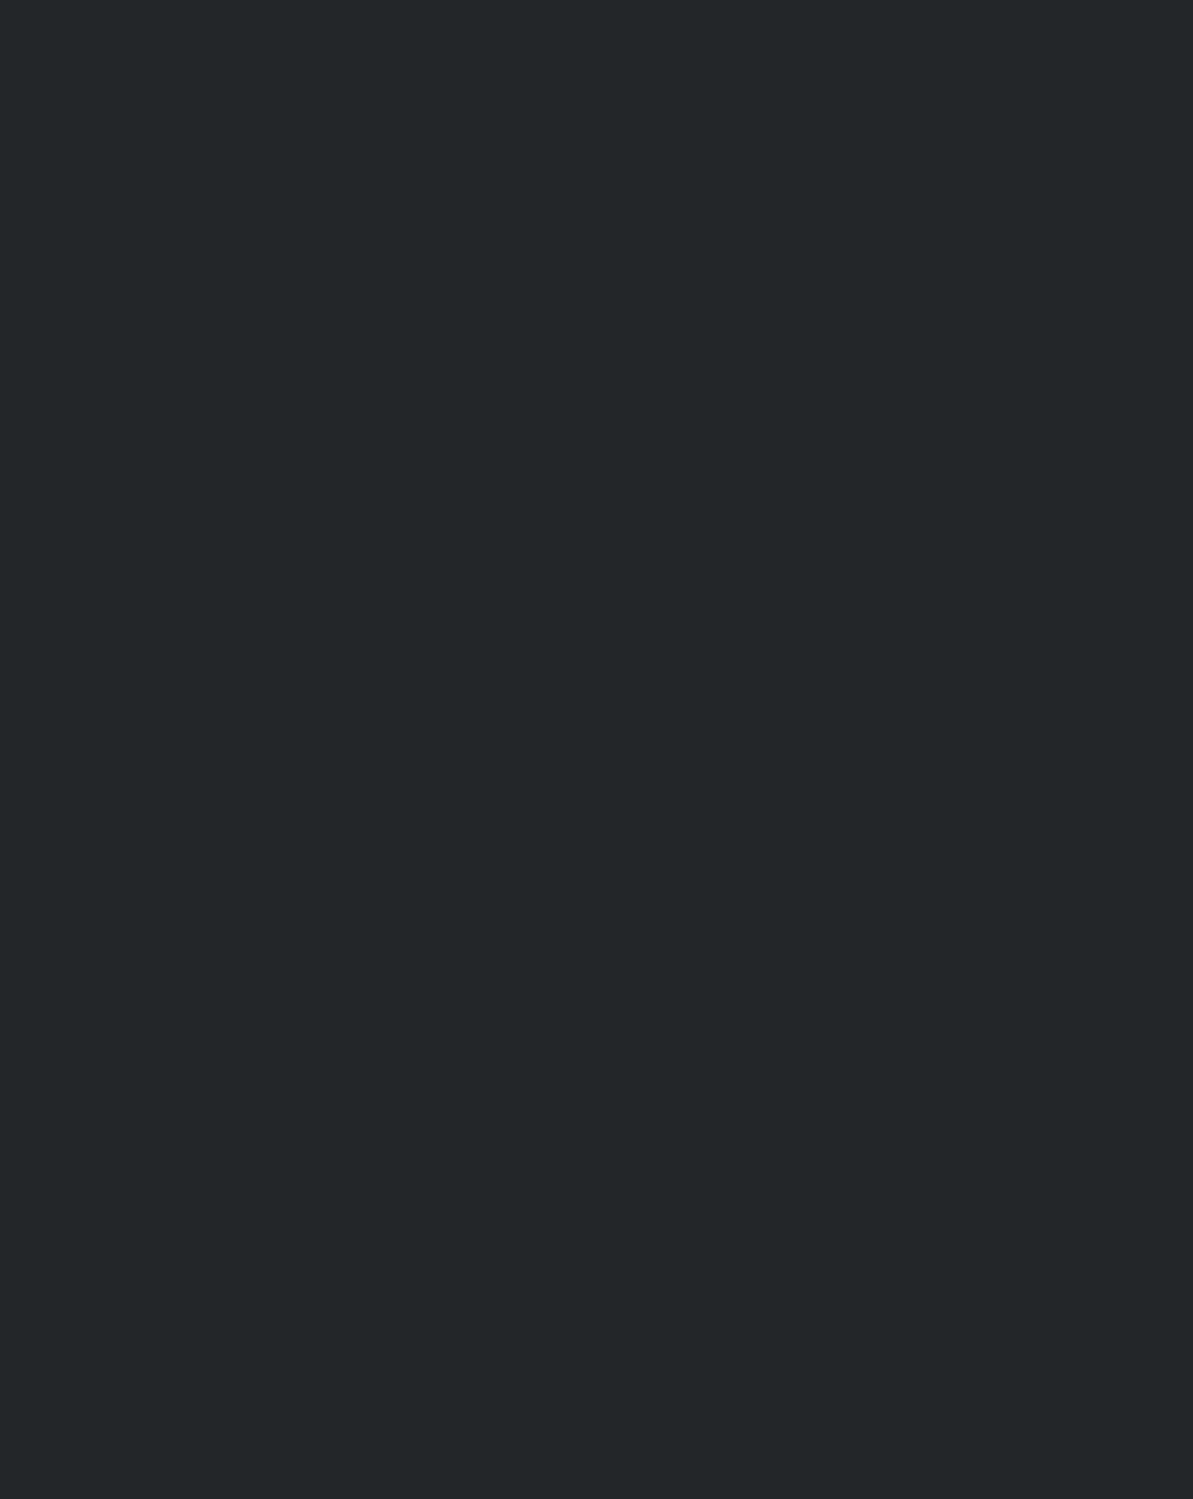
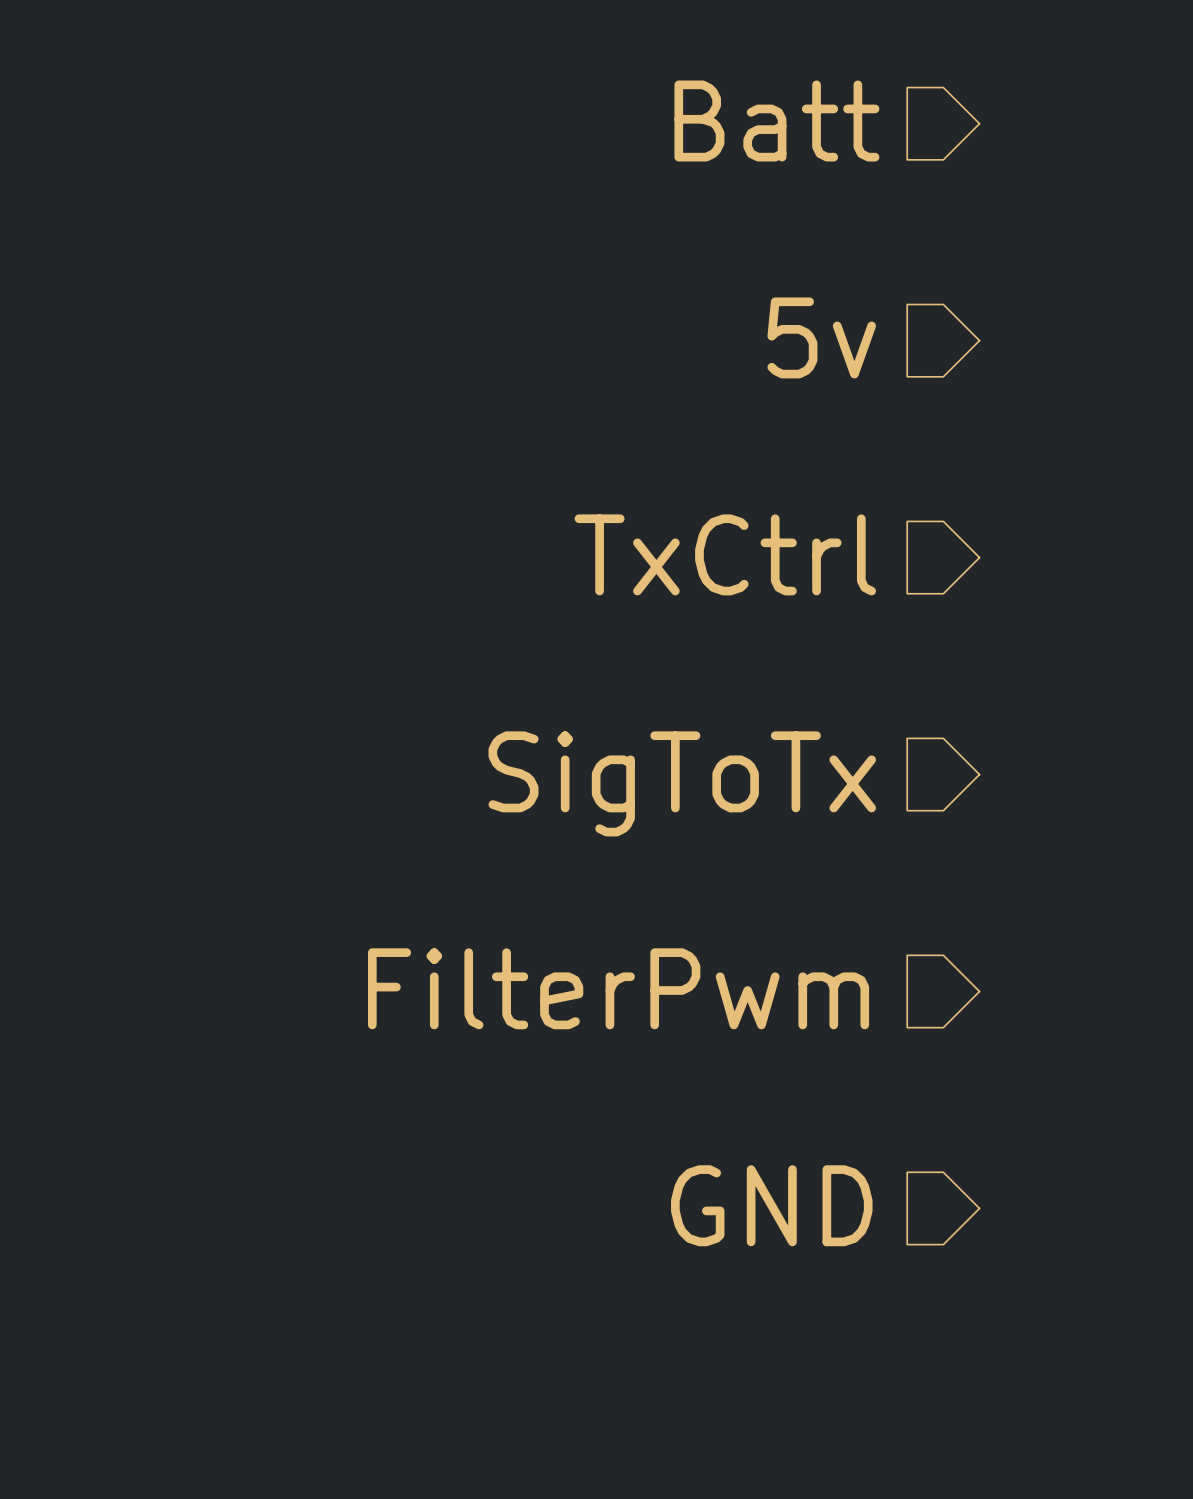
hierarchical label: none -> Batt (776, 120)
hierarchical label: none -> 5v (821, 337)
hierarchical label: none -> TxCtrl (725, 554)
hierarchical label: none -> SigToTx (682, 783)
hierarchical label: none -> FilterPwm (618, 988)
hierarchical label: none -> GND (771, 1205)

